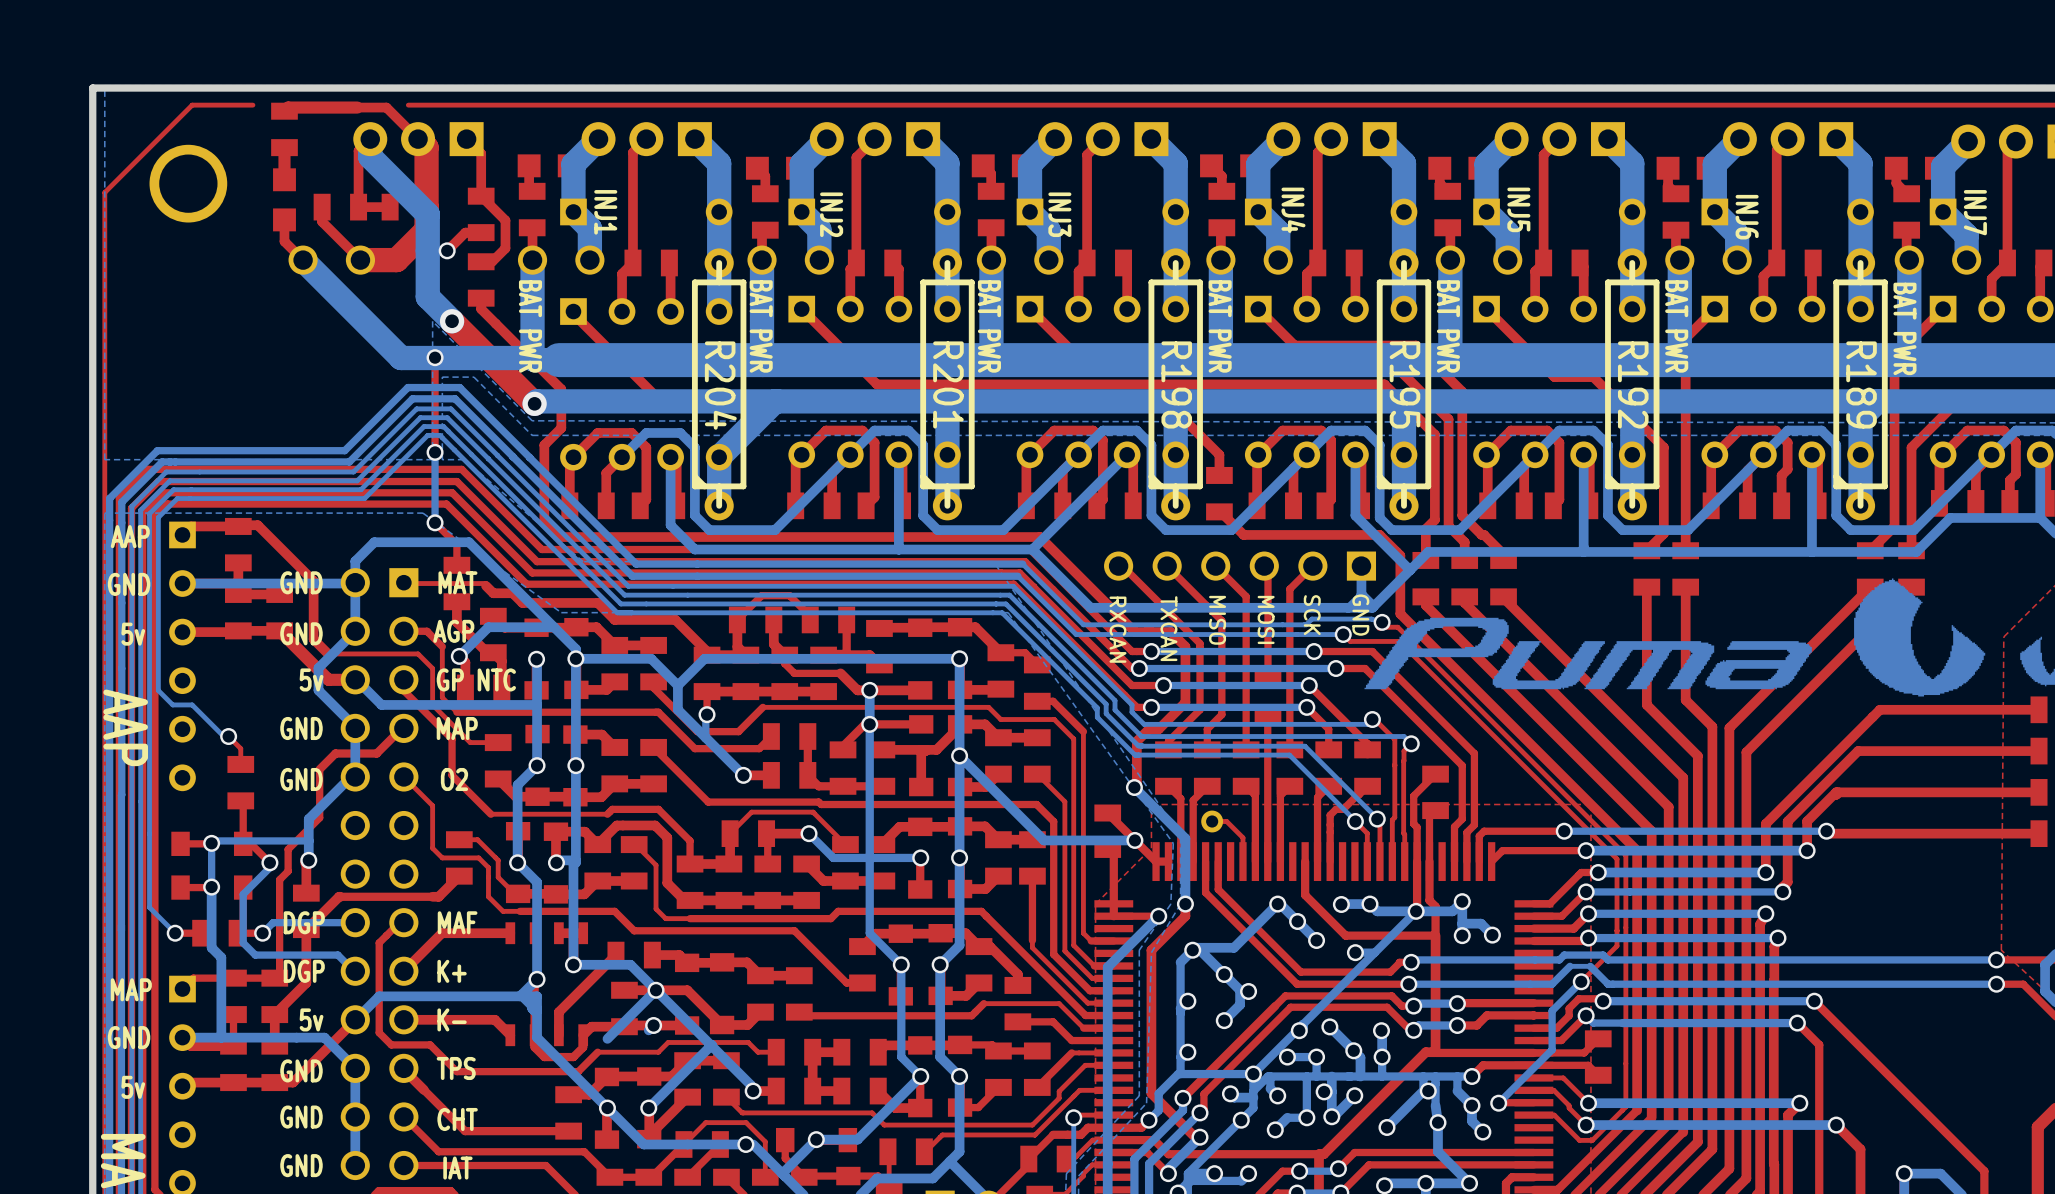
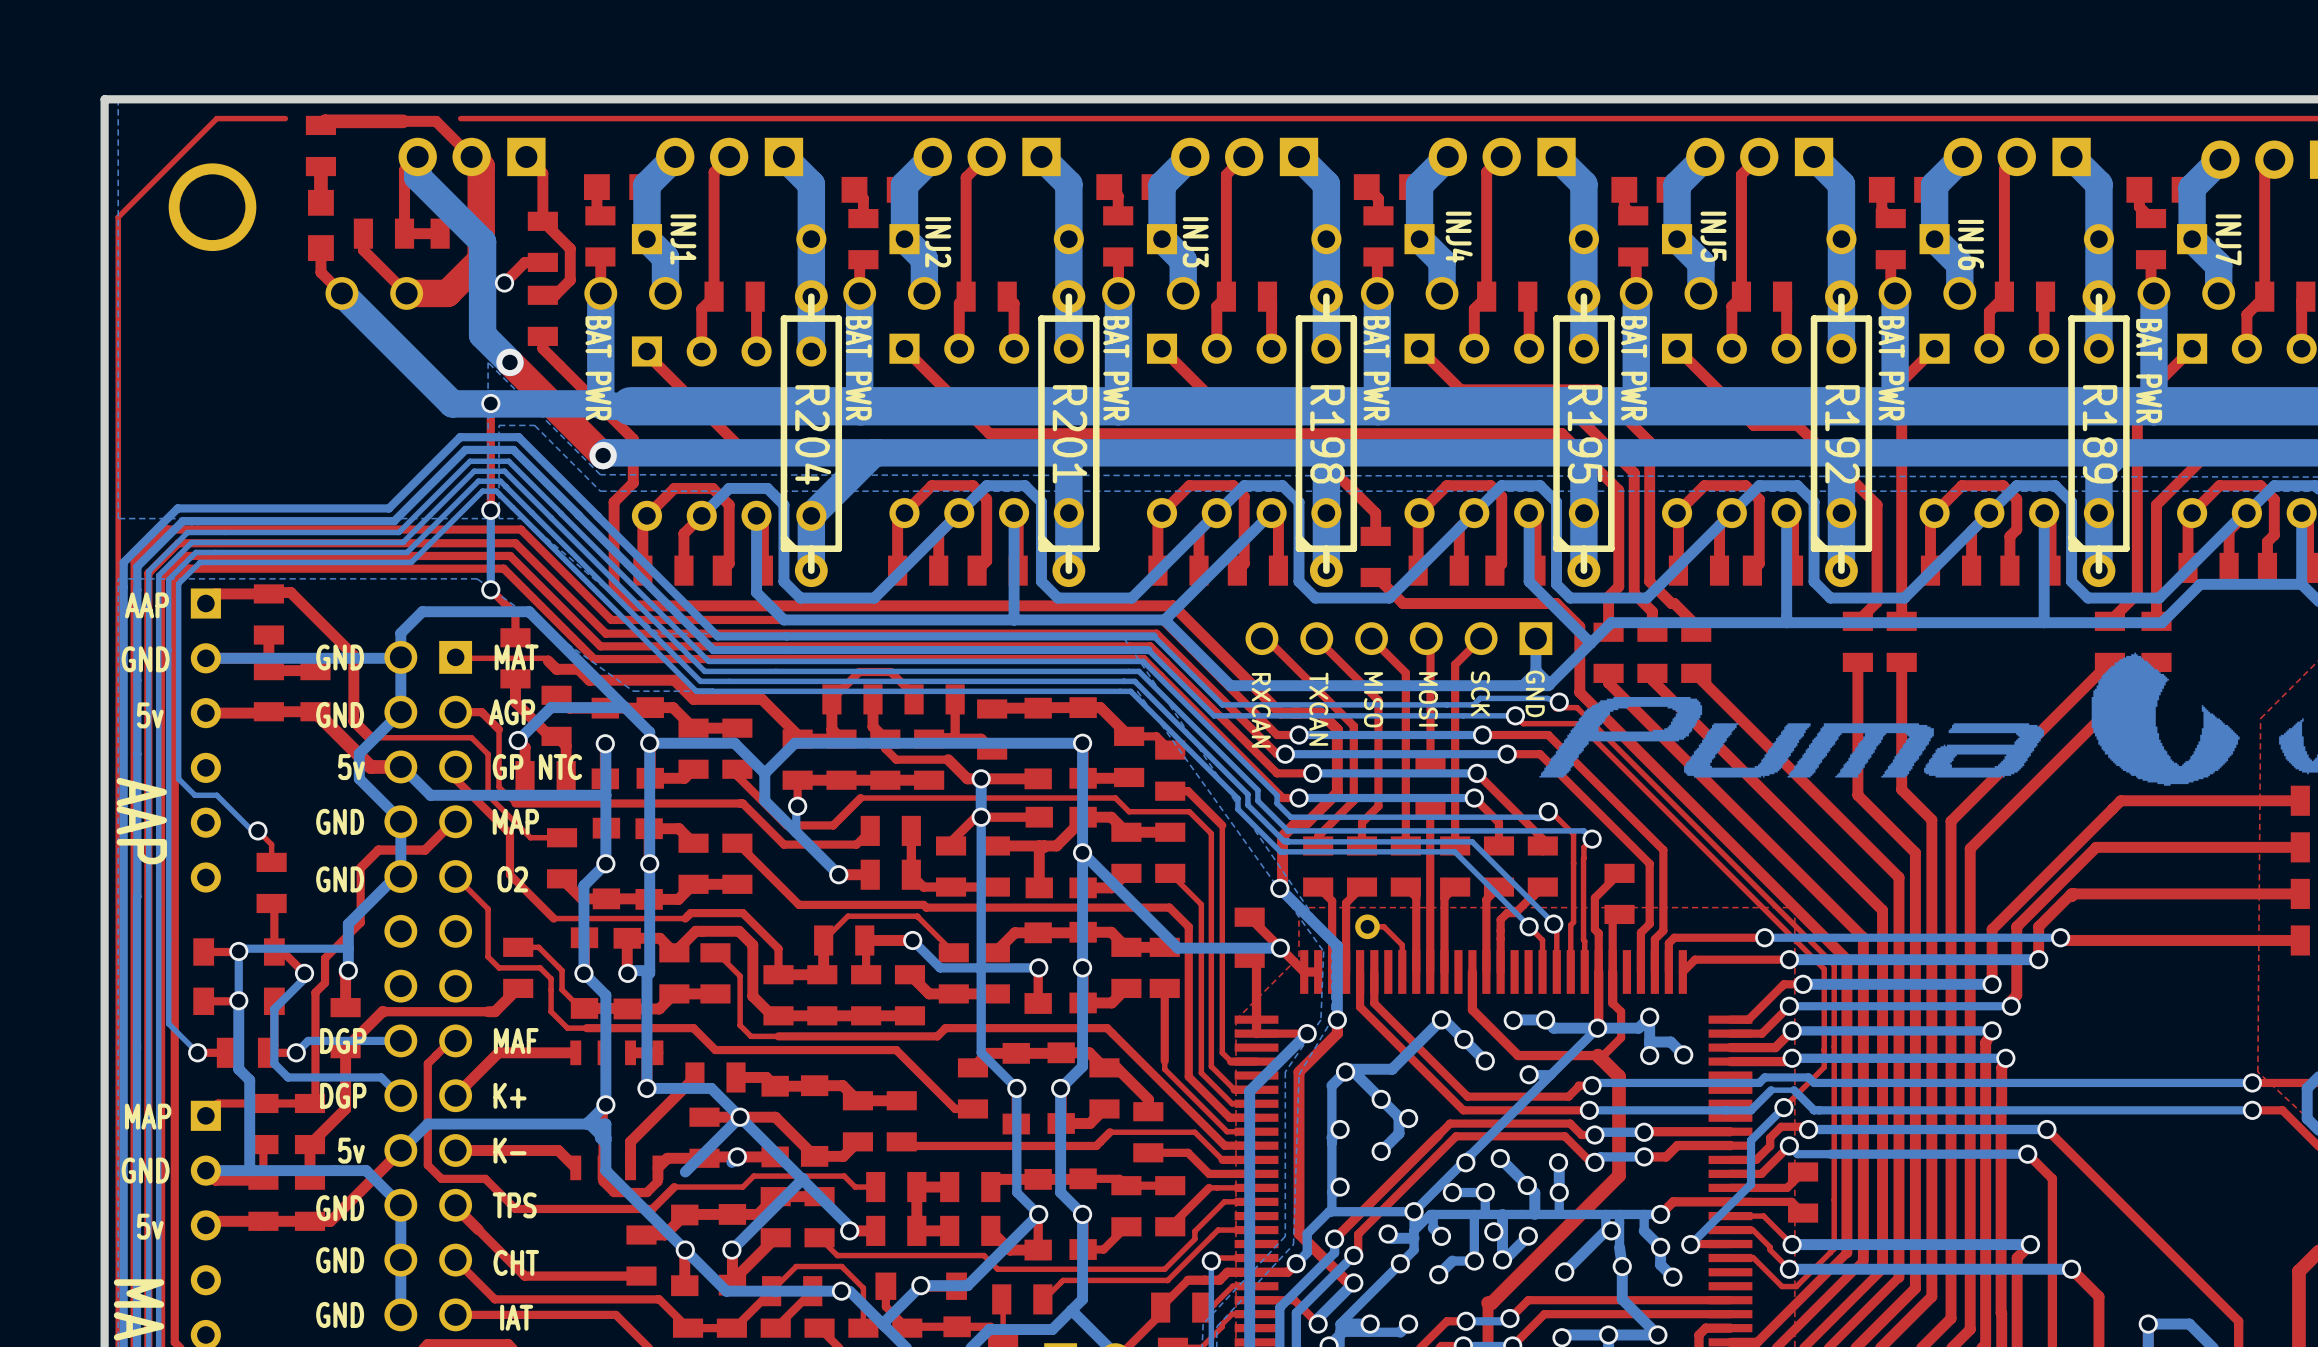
top track: (1429, 889) (1429, 900) (1435, 906) (1435, 935) -> (1612, 1003) (1621, 1011) (1621, 1037) (1600, 1058)
top track: (1435, 935) (1416, 935) -> (1488, 1302) (1491, 1302) (1618, 1175) (1618, 1076) (1598, 1055)
top track: (1435, 935) (1435, 1052) -> none
top track: (1435, 1052) (1533, 1052) -> none
top track: (1435, 1052) (1425, 1052) (1323, 1154) (1168, 1154) (1154, 1140) (1113, 1140) -> none

